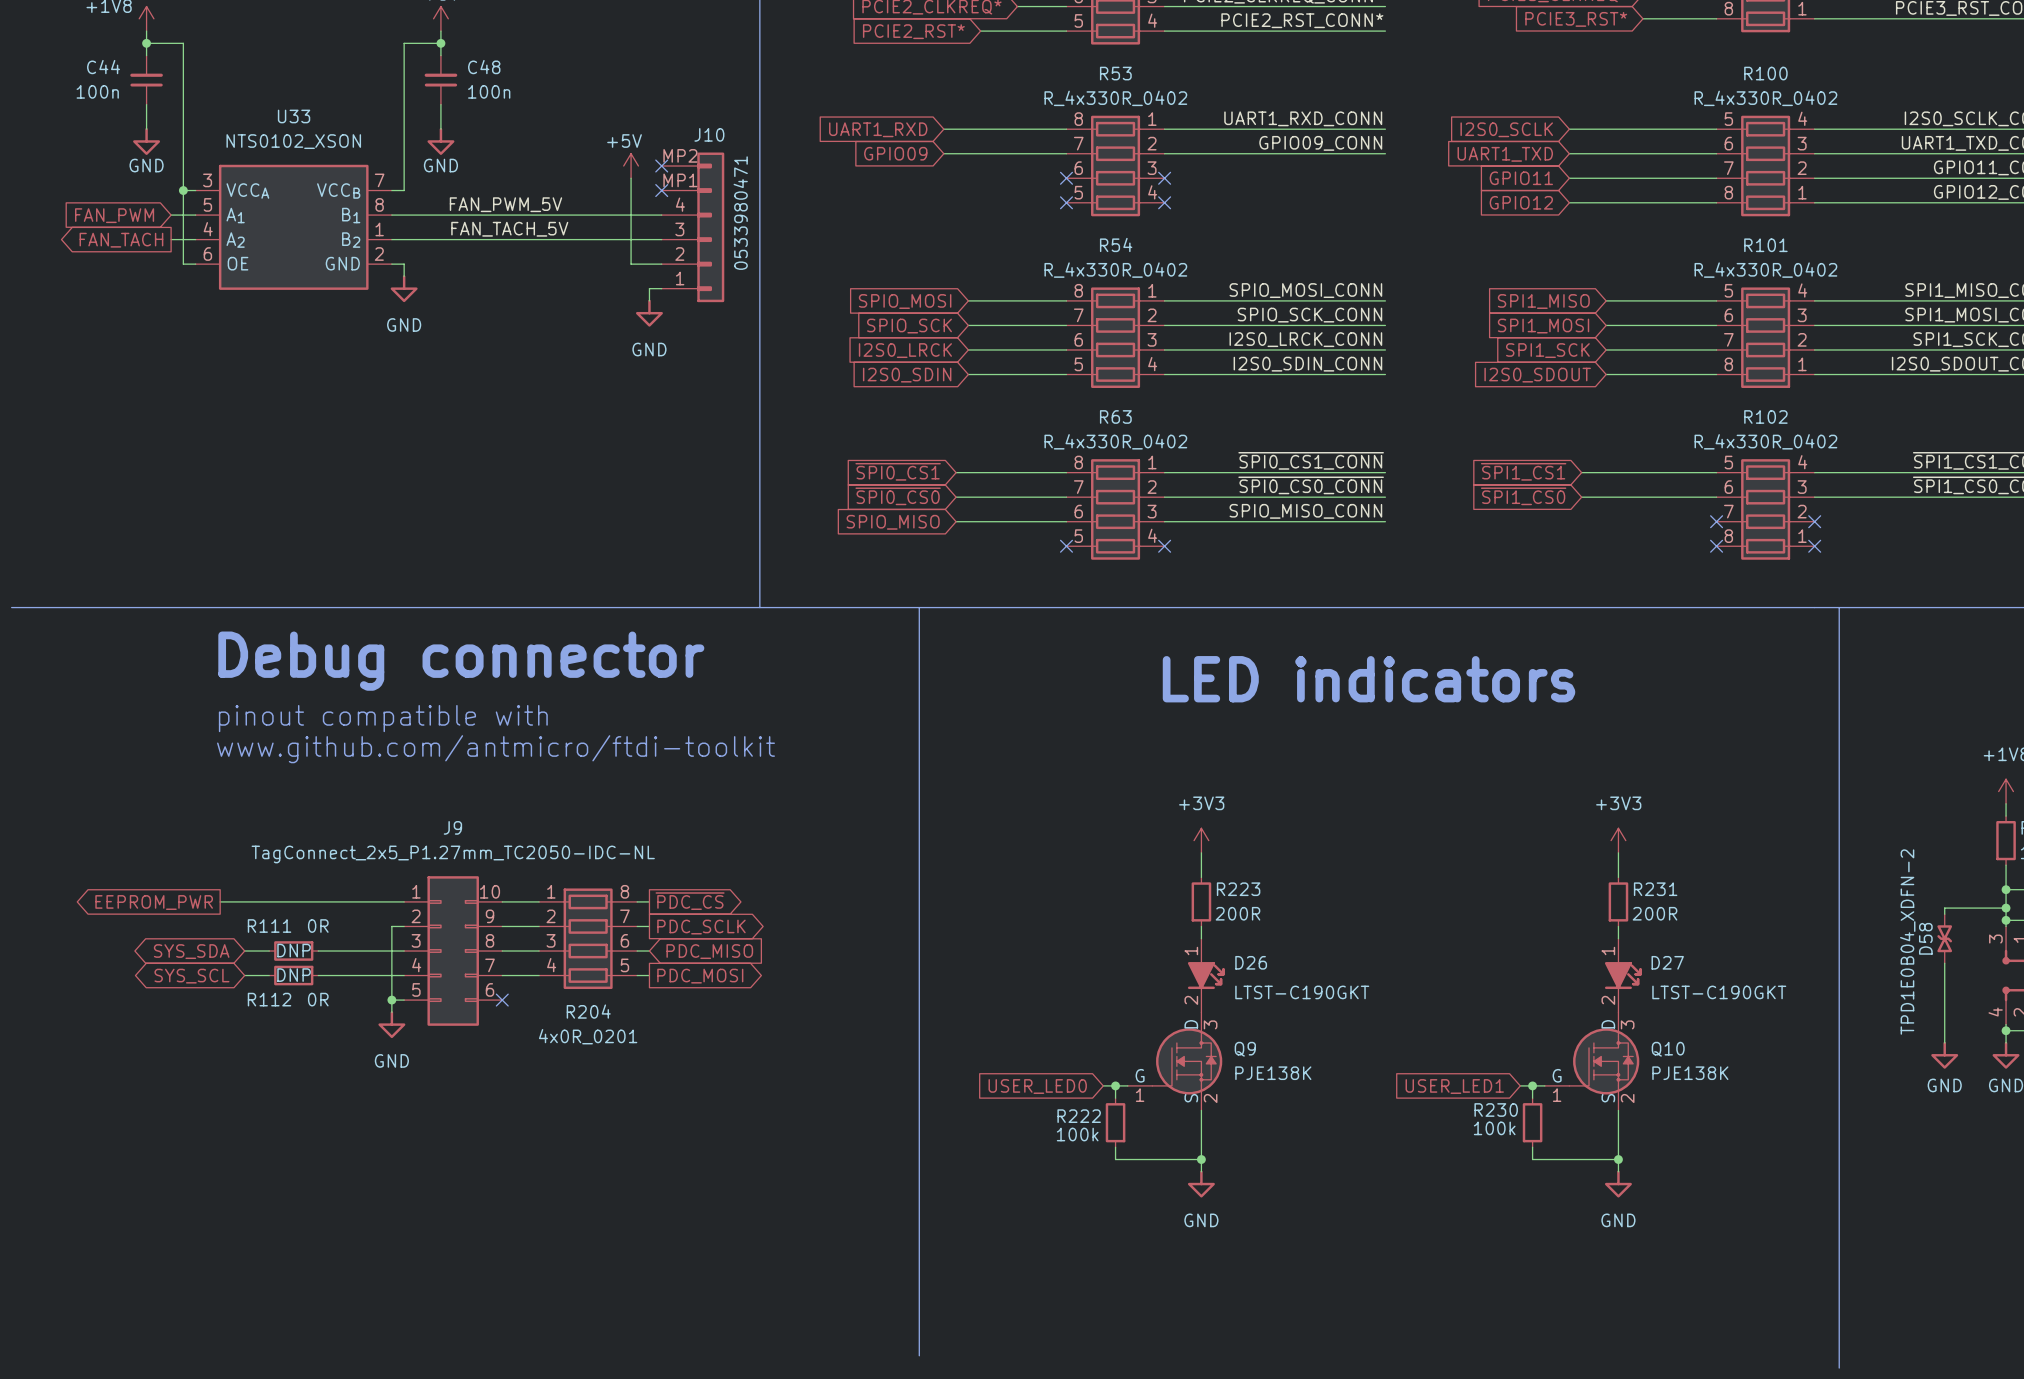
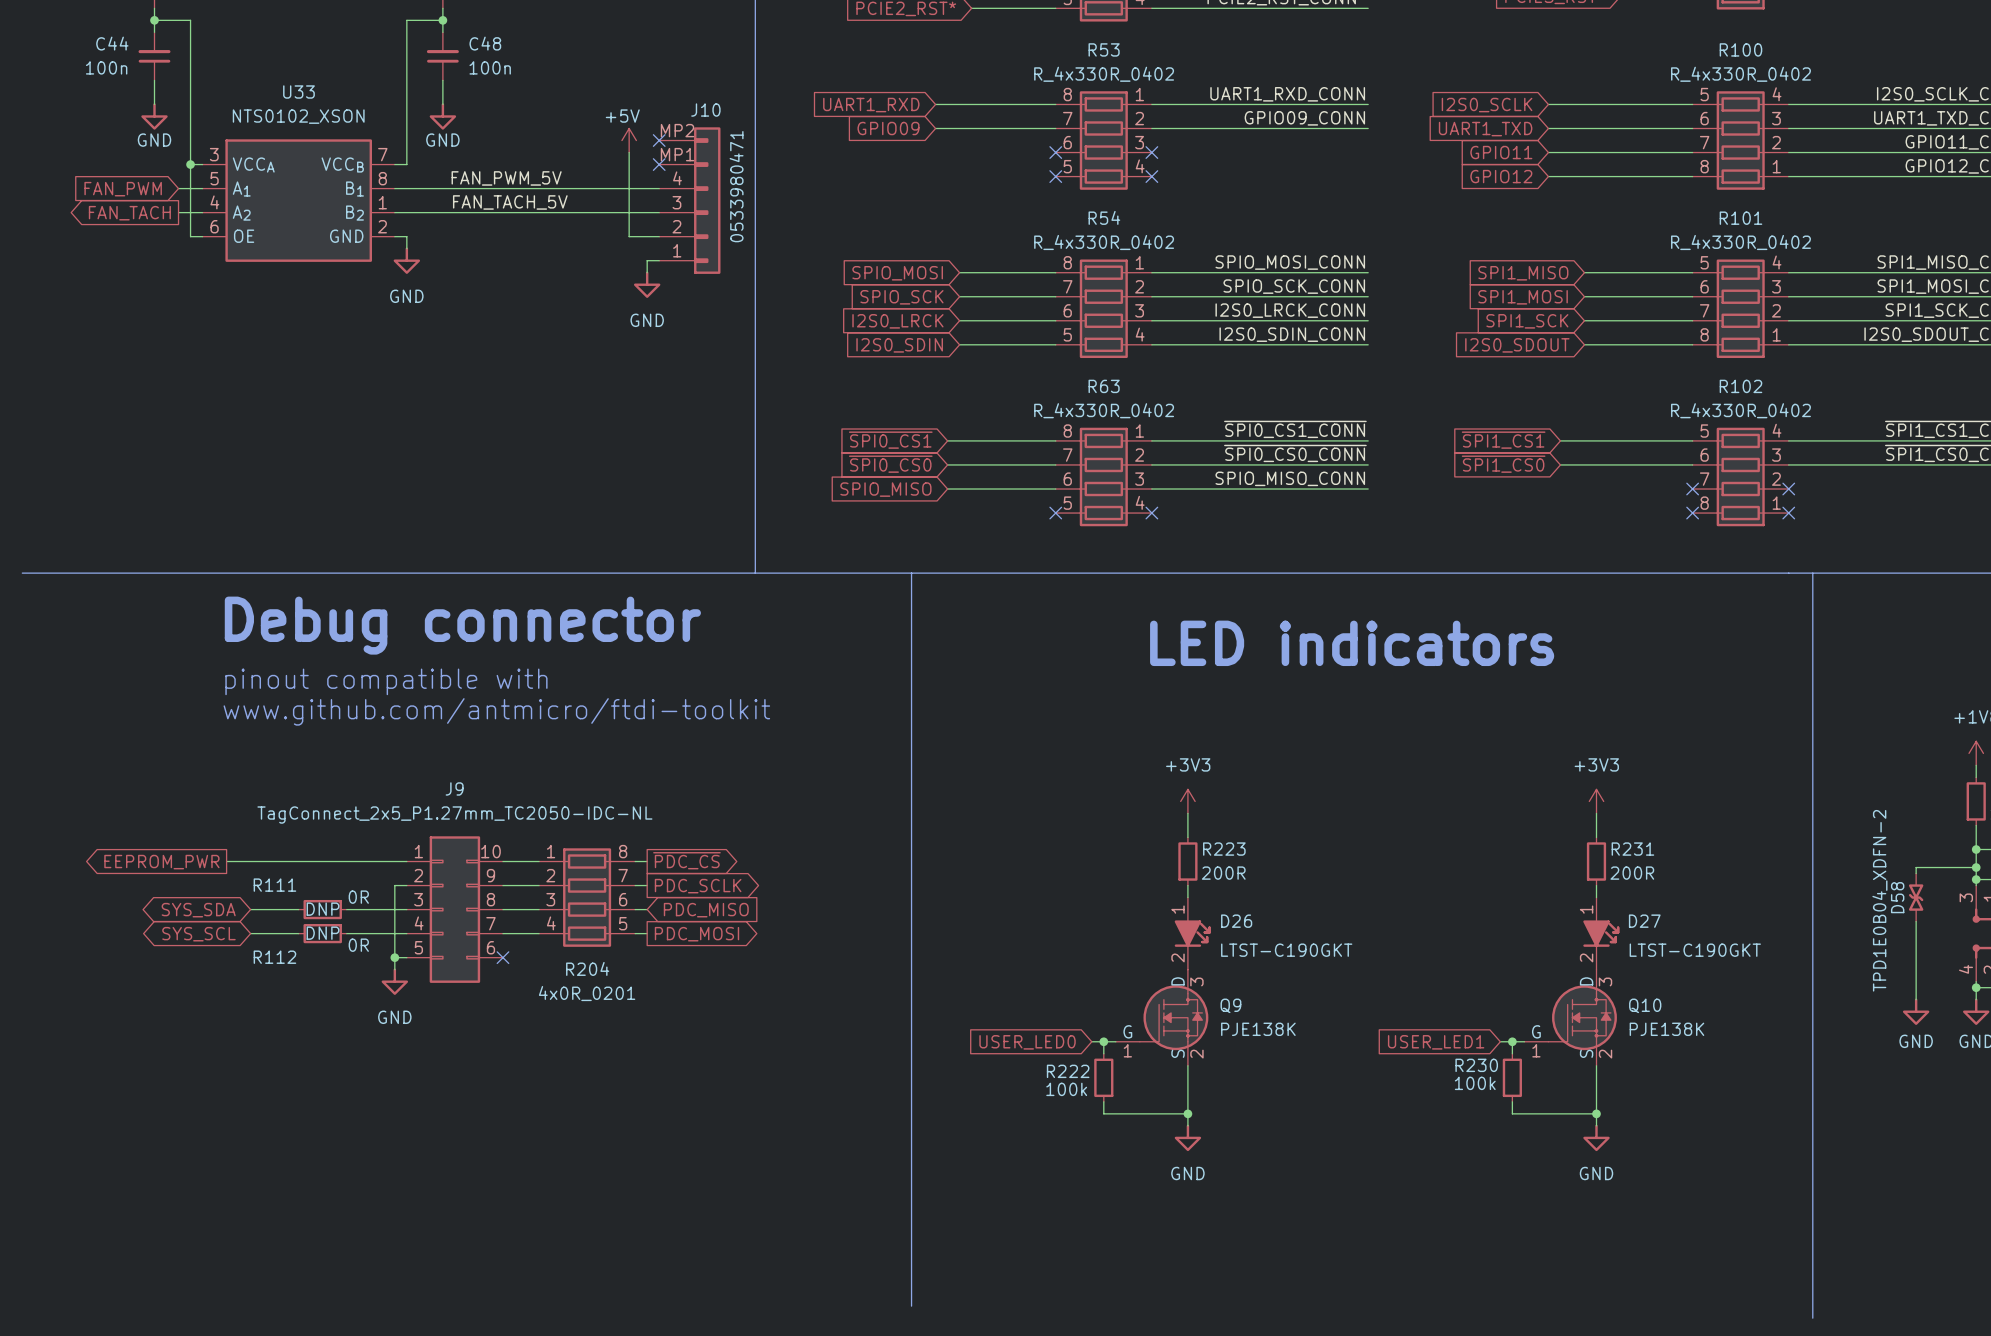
R111 text position: 0R (318, 926) -> 0R (358, 897)
R111 position: (293, 951) -> (322, 909)
R112 position: (293, 975) -> (322, 933)
R112 text position: 0R (318, 999) -> 0R (358, 945)

